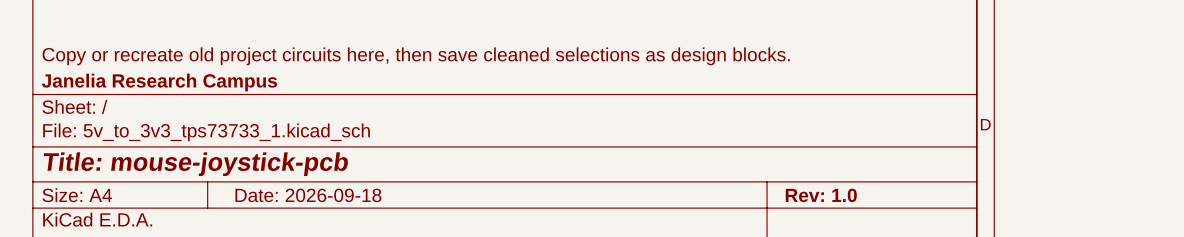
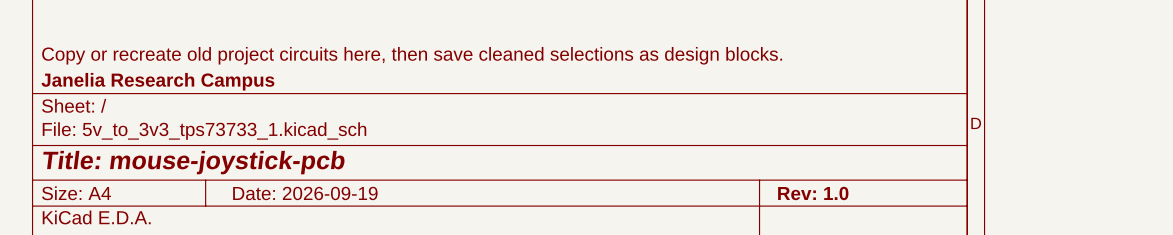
title block: Date: 2026-09-18 (308, 195) -> Date: 2026-09-19 (305, 193)

